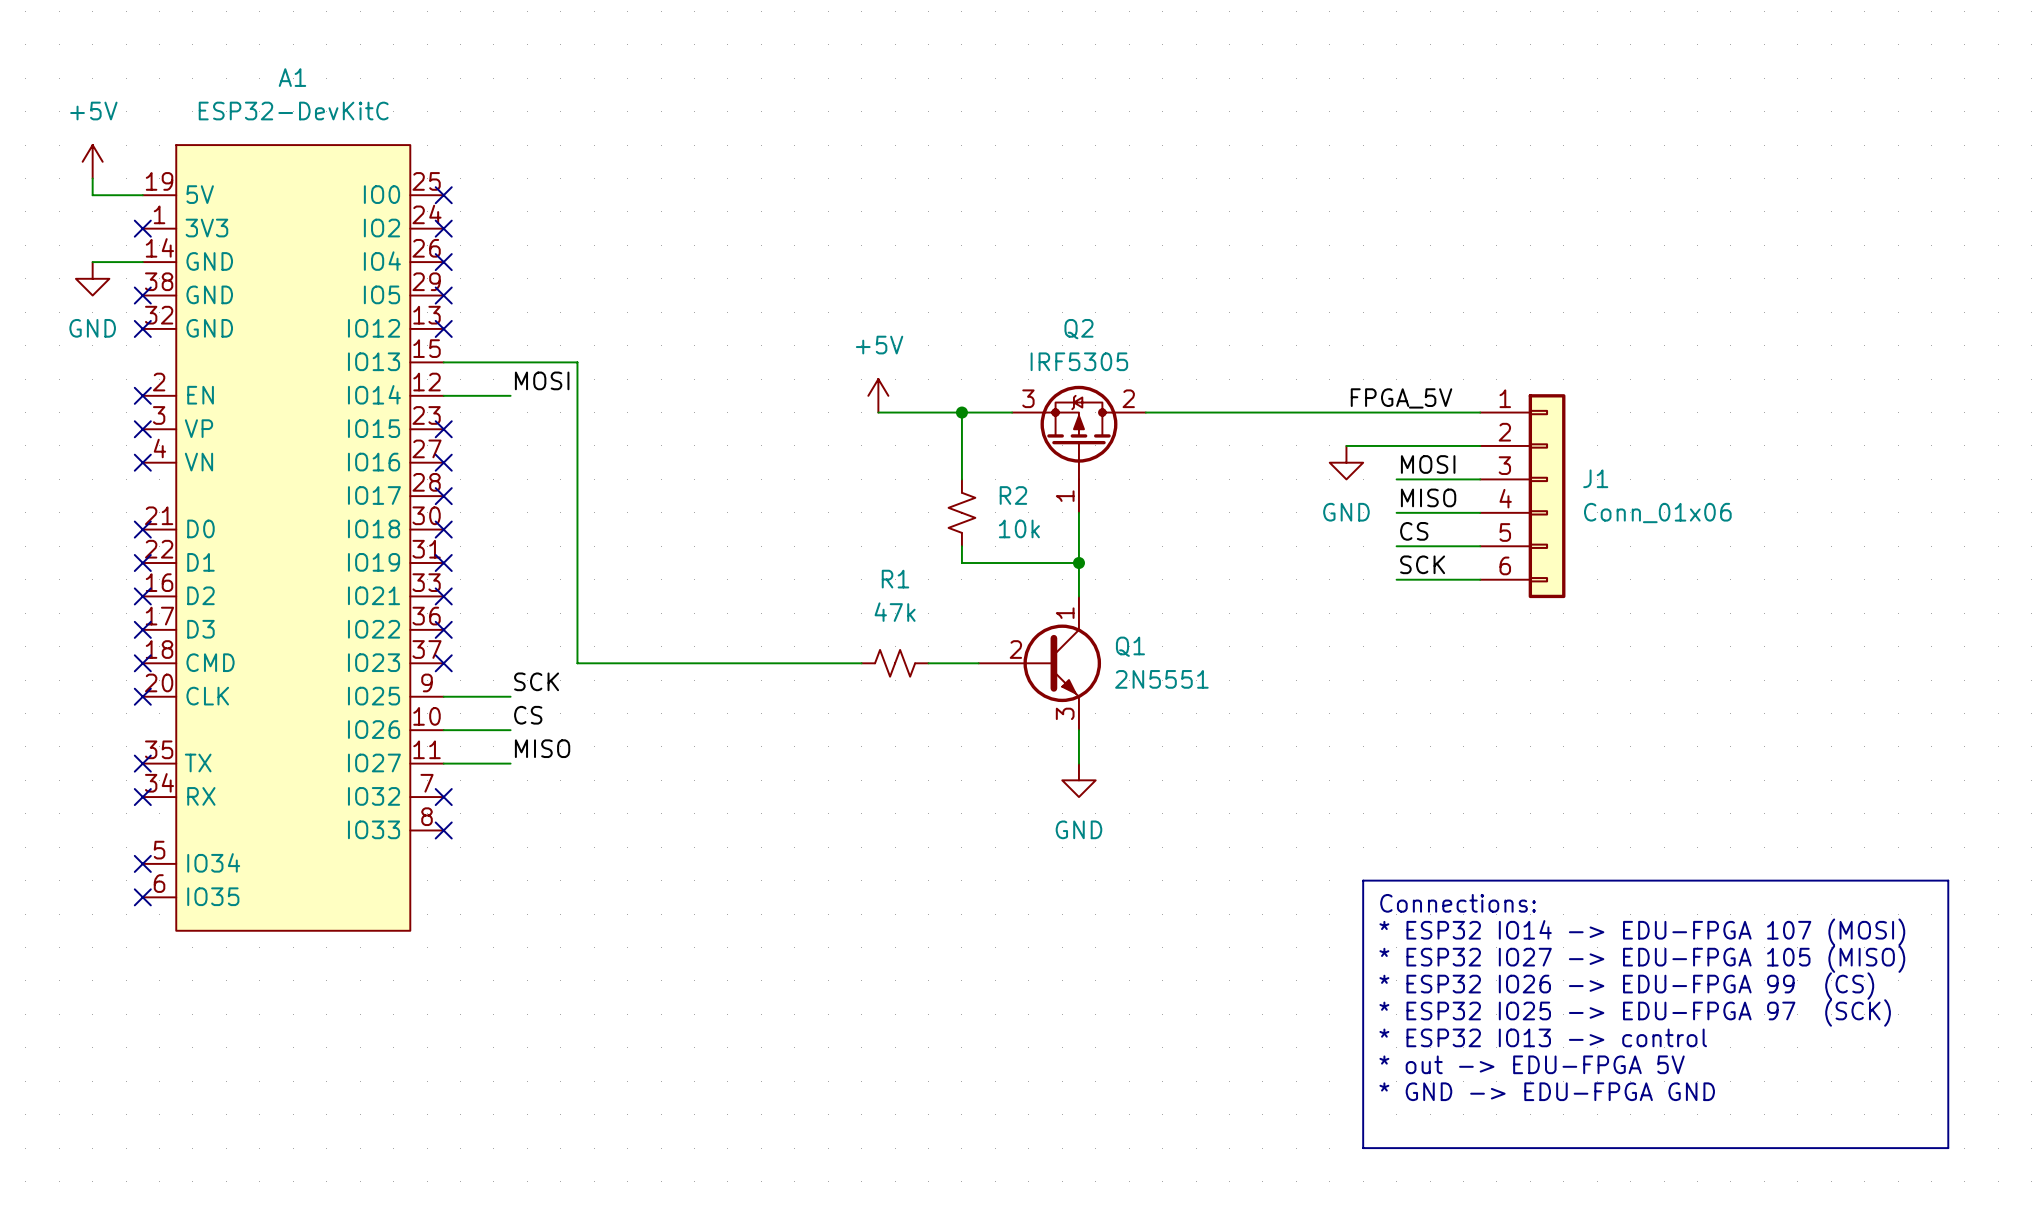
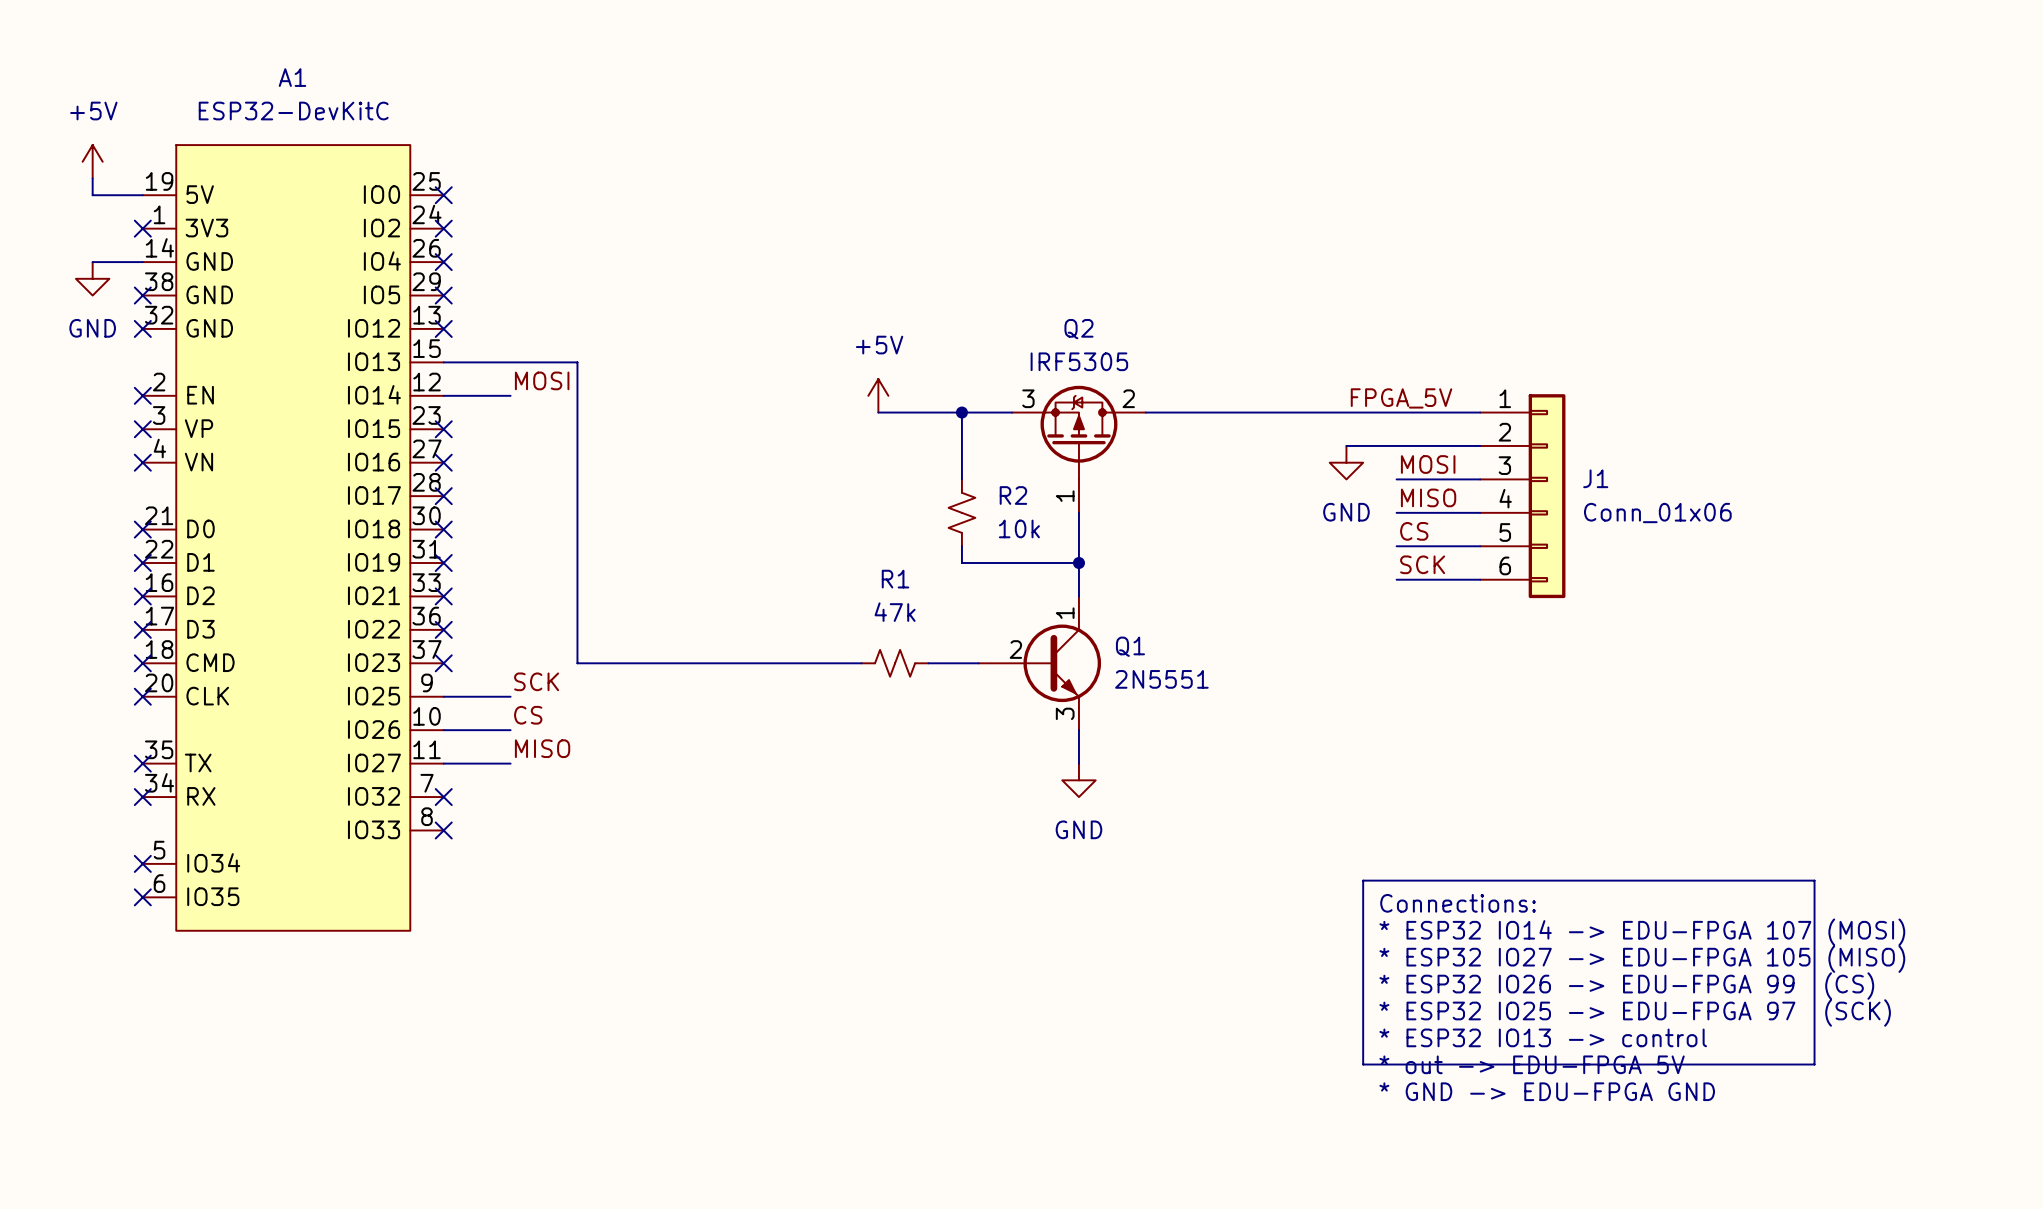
line: (1814, 880) (1948, 880) (1948, 1148) (1363, 1148) (1363, 1064) -> (1814, 880) (1814, 1064) (1363, 1064)

